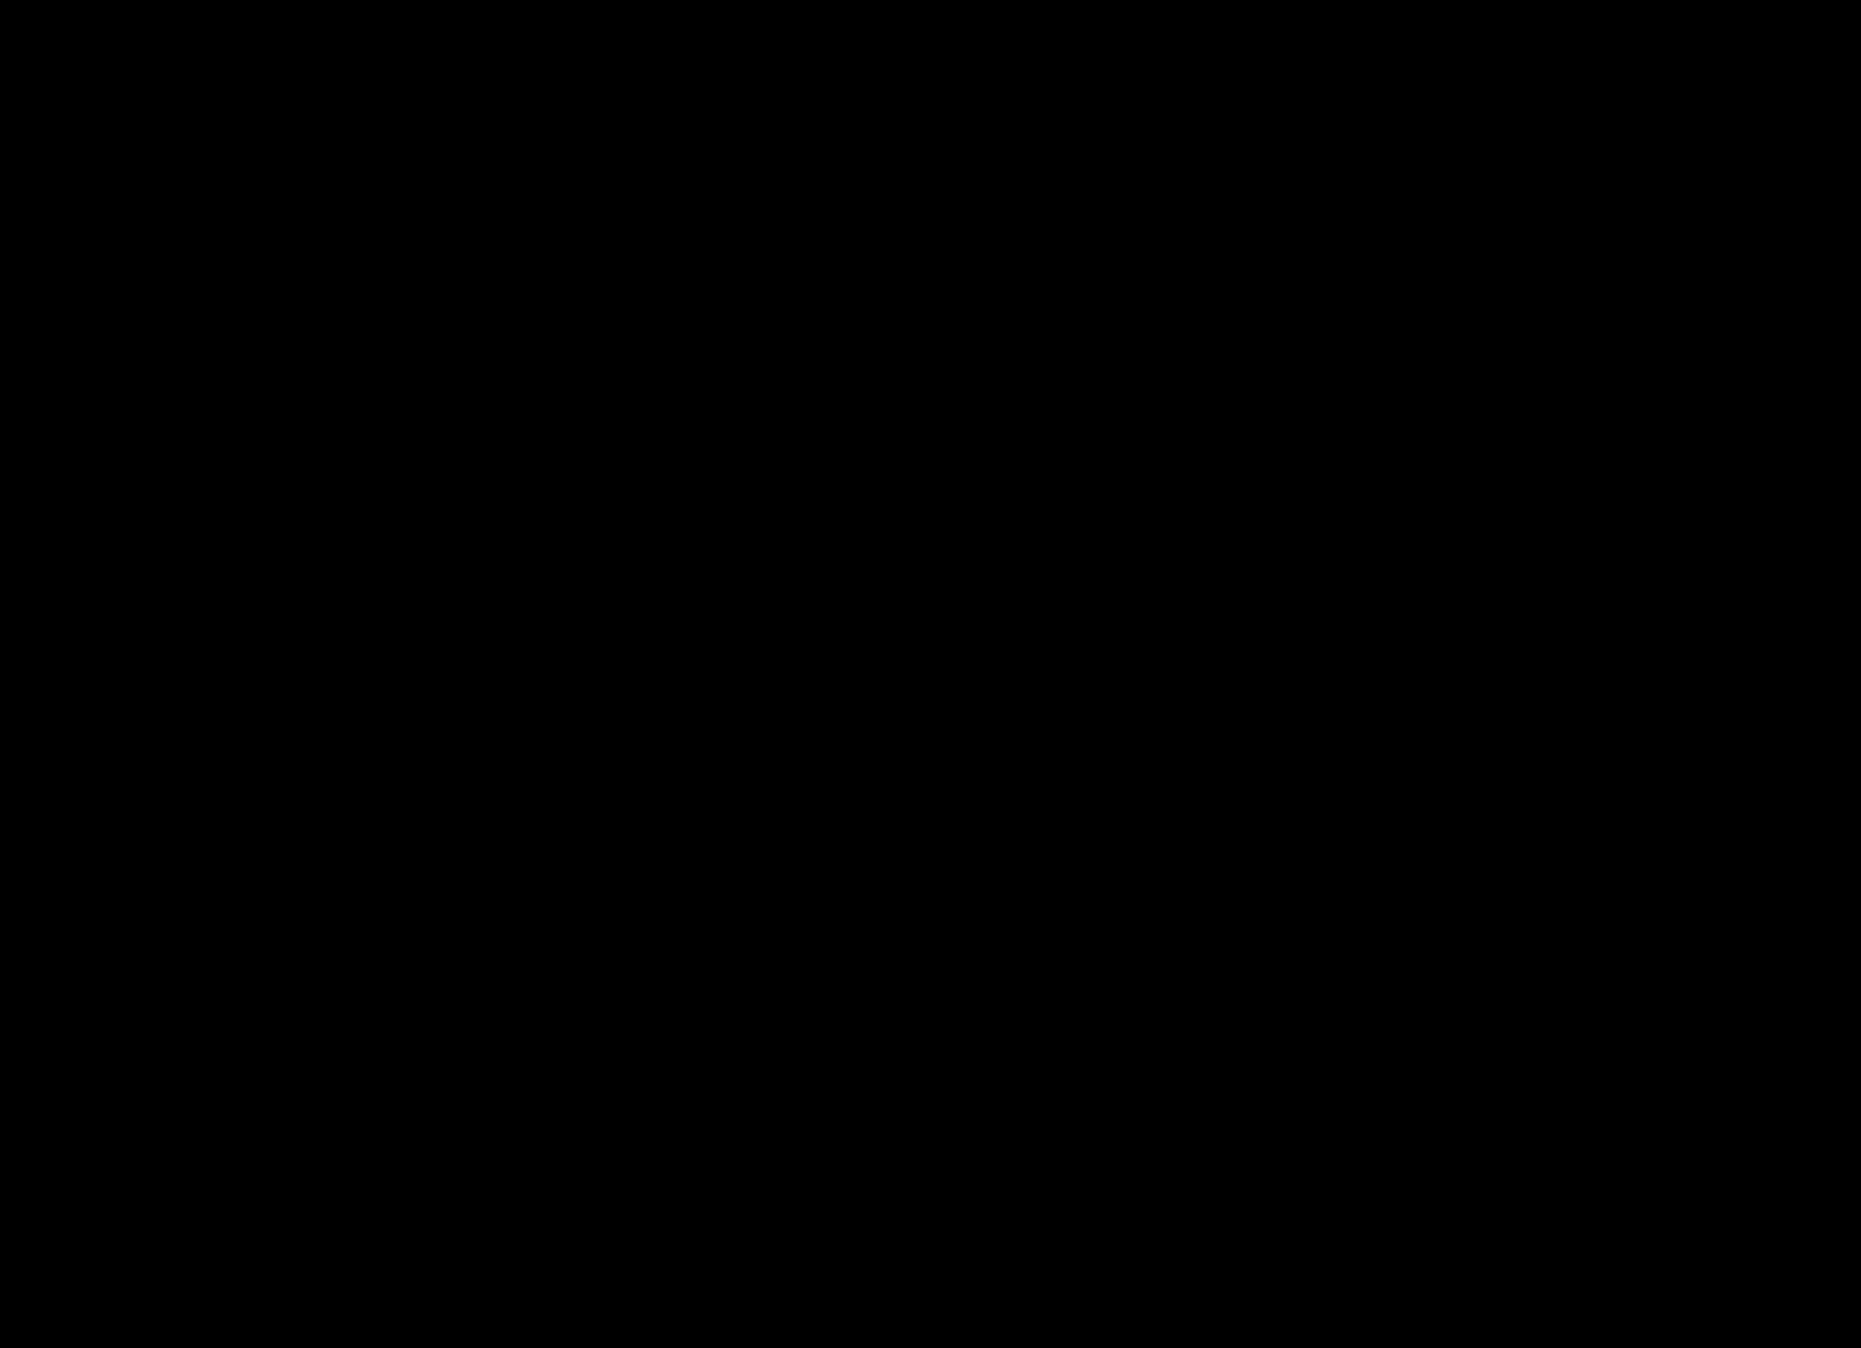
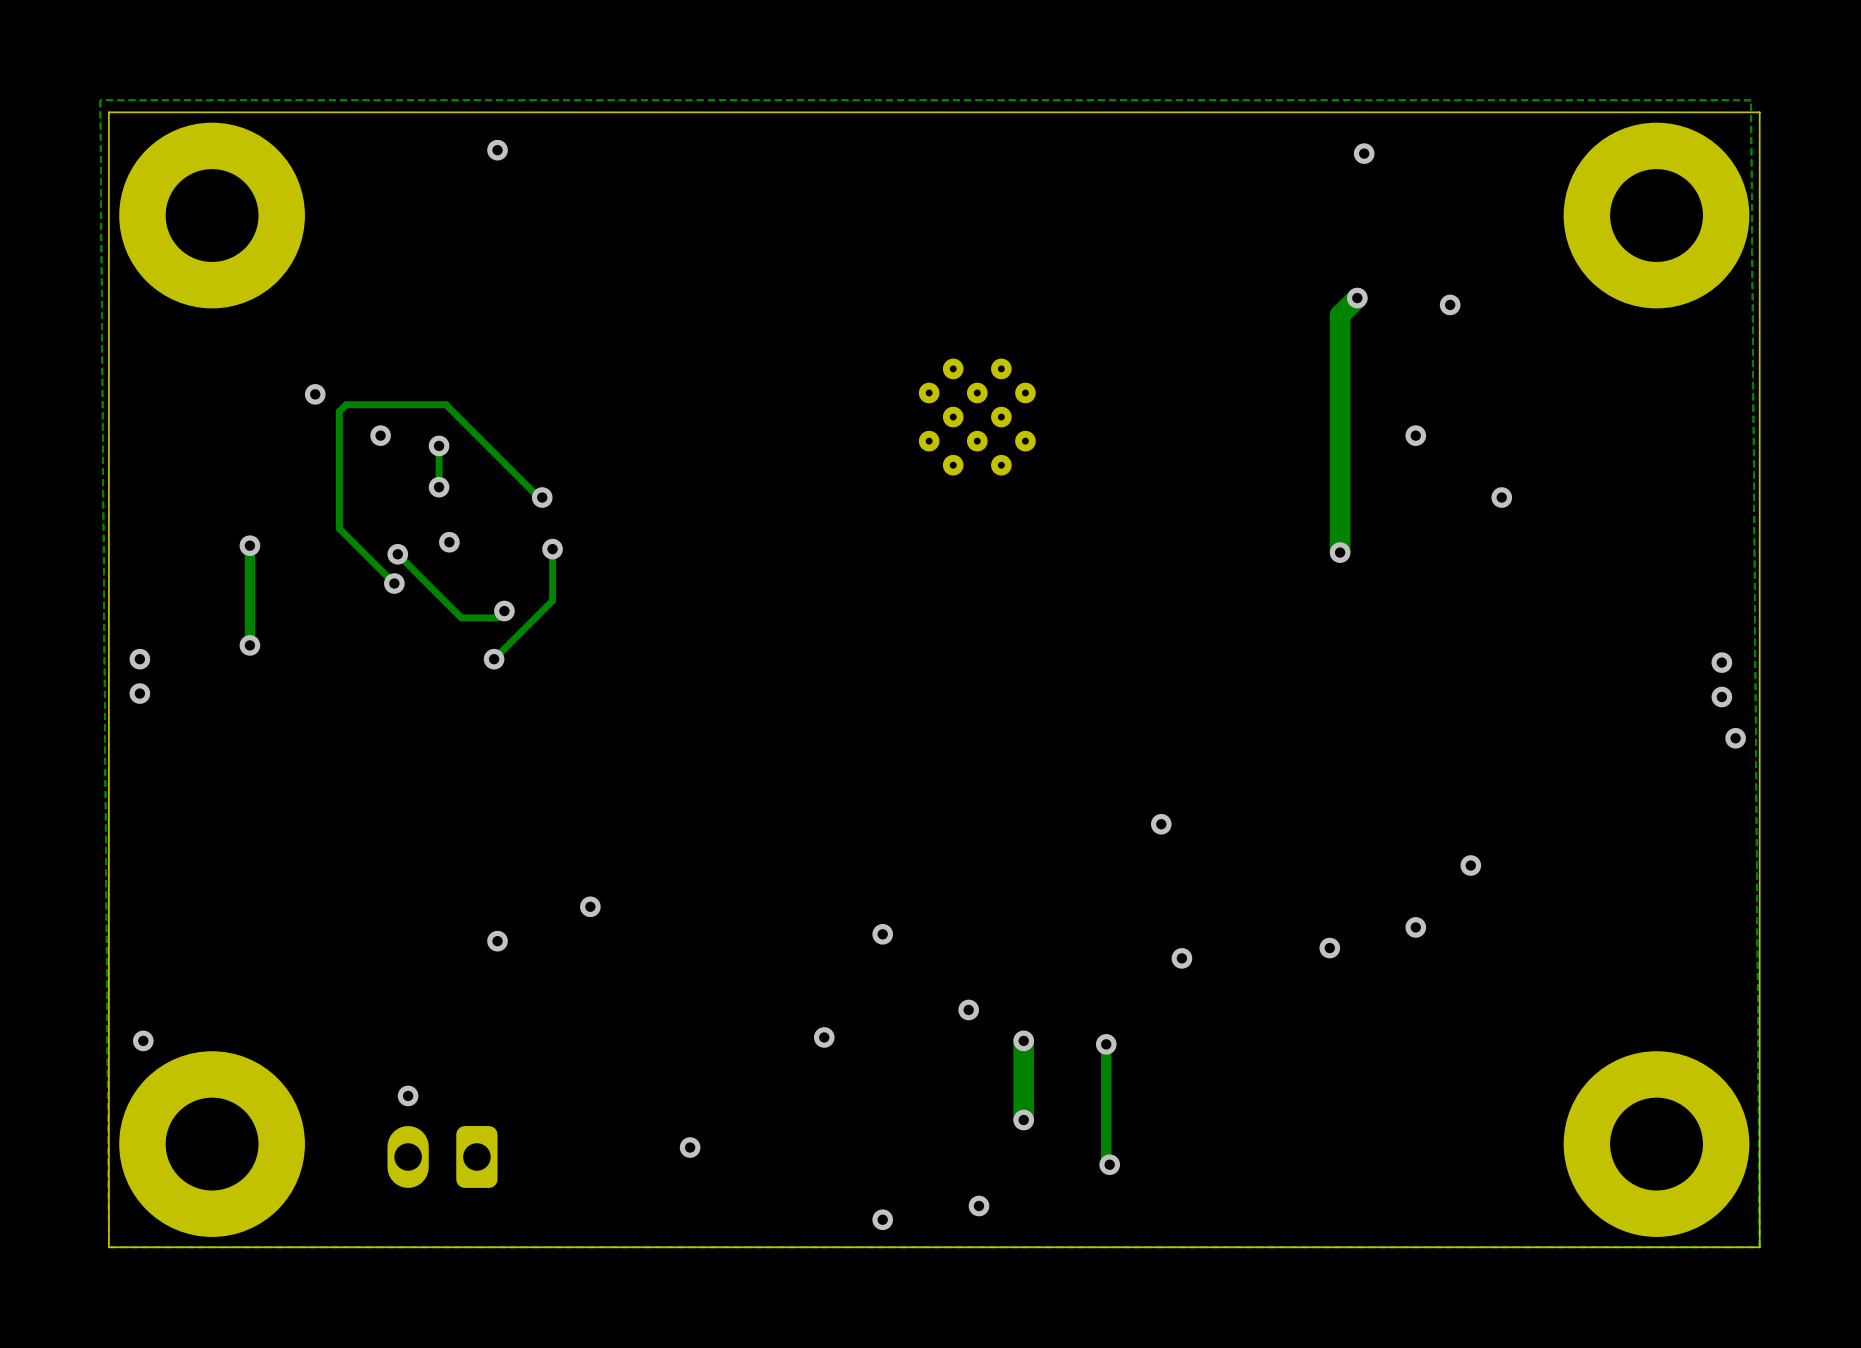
zone outline: none -> (1751, 100) (1759, 1247) (108, 1247) (100, 100) (1751, 100)
board edge: none -> (1759, 112) (108, 112) (108, 1247) (1759, 1247) (1759, 112)
via: none -> (497, 150)
via: none -> (1364, 153)
part: none -> (212, 215)
part: none -> (1656, 215)
track: none -> (1357, 298) (1340, 315) (1340, 552)
via: none -> (1357, 298)
via: none -> (1450, 304)
via: none -> (315, 394)
part: none -> (977, 417)
via: none -> (380, 435)
via: none -> (1415, 435)
track: none -> (439, 445) (439, 487)
via: none -> (439, 445)
via: none -> (439, 487)
track: none -> (542, 497) (538, 497) (445, 404) (346, 404) (339, 411) (339, 528) (394, 583)
via: none -> (542, 497)
via: none -> (1501, 497)
via: none -> (449, 542)
track: none -> (249, 545) (249, 645)
via: none -> (249, 545)
track: none -> (552, 549) (552, 600) (494, 659)
via: none -> (552, 549)
via: none -> (1340, 552)
track: none -> (397, 554) (461, 617) (497, 617) (504, 611)
via: none -> (397, 554)
via: none -> (394, 583)
via: none -> (504, 611)
via: none -> (249, 645)
via: none -> (139, 659)
via: none -> (494, 659)
via: none -> (1721, 662)
via: none -> (139, 693)
via: none -> (1721, 697)
via: none -> (1735, 738)
via: none -> (1161, 824)
via: none -> (1470, 865)
via: none -> (590, 906)
via: none -> (1415, 927)
via: none -> (882, 934)
via: none -> (497, 941)
via: none -> (1329, 948)
via: none -> (1181, 958)
via: none -> (968, 1009)
via: none -> (824, 1037)
via: none -> (143, 1040)
track: none -> (1023, 1040) (1023, 1120)
via: none -> (1023, 1040)
track: none -> (1106, 1044) (1106, 1161) (1109, 1164)
via: none -> (1106, 1044)
via: none -> (408, 1095)
via: none -> (1023, 1120)
part: none -> (212, 1144)
part: none -> (1656, 1144)
via: none -> (690, 1147)
part: none -> (442, 1156)
via: none -> (1109, 1164)
via: none -> (979, 1205)
via: none -> (882, 1219)

